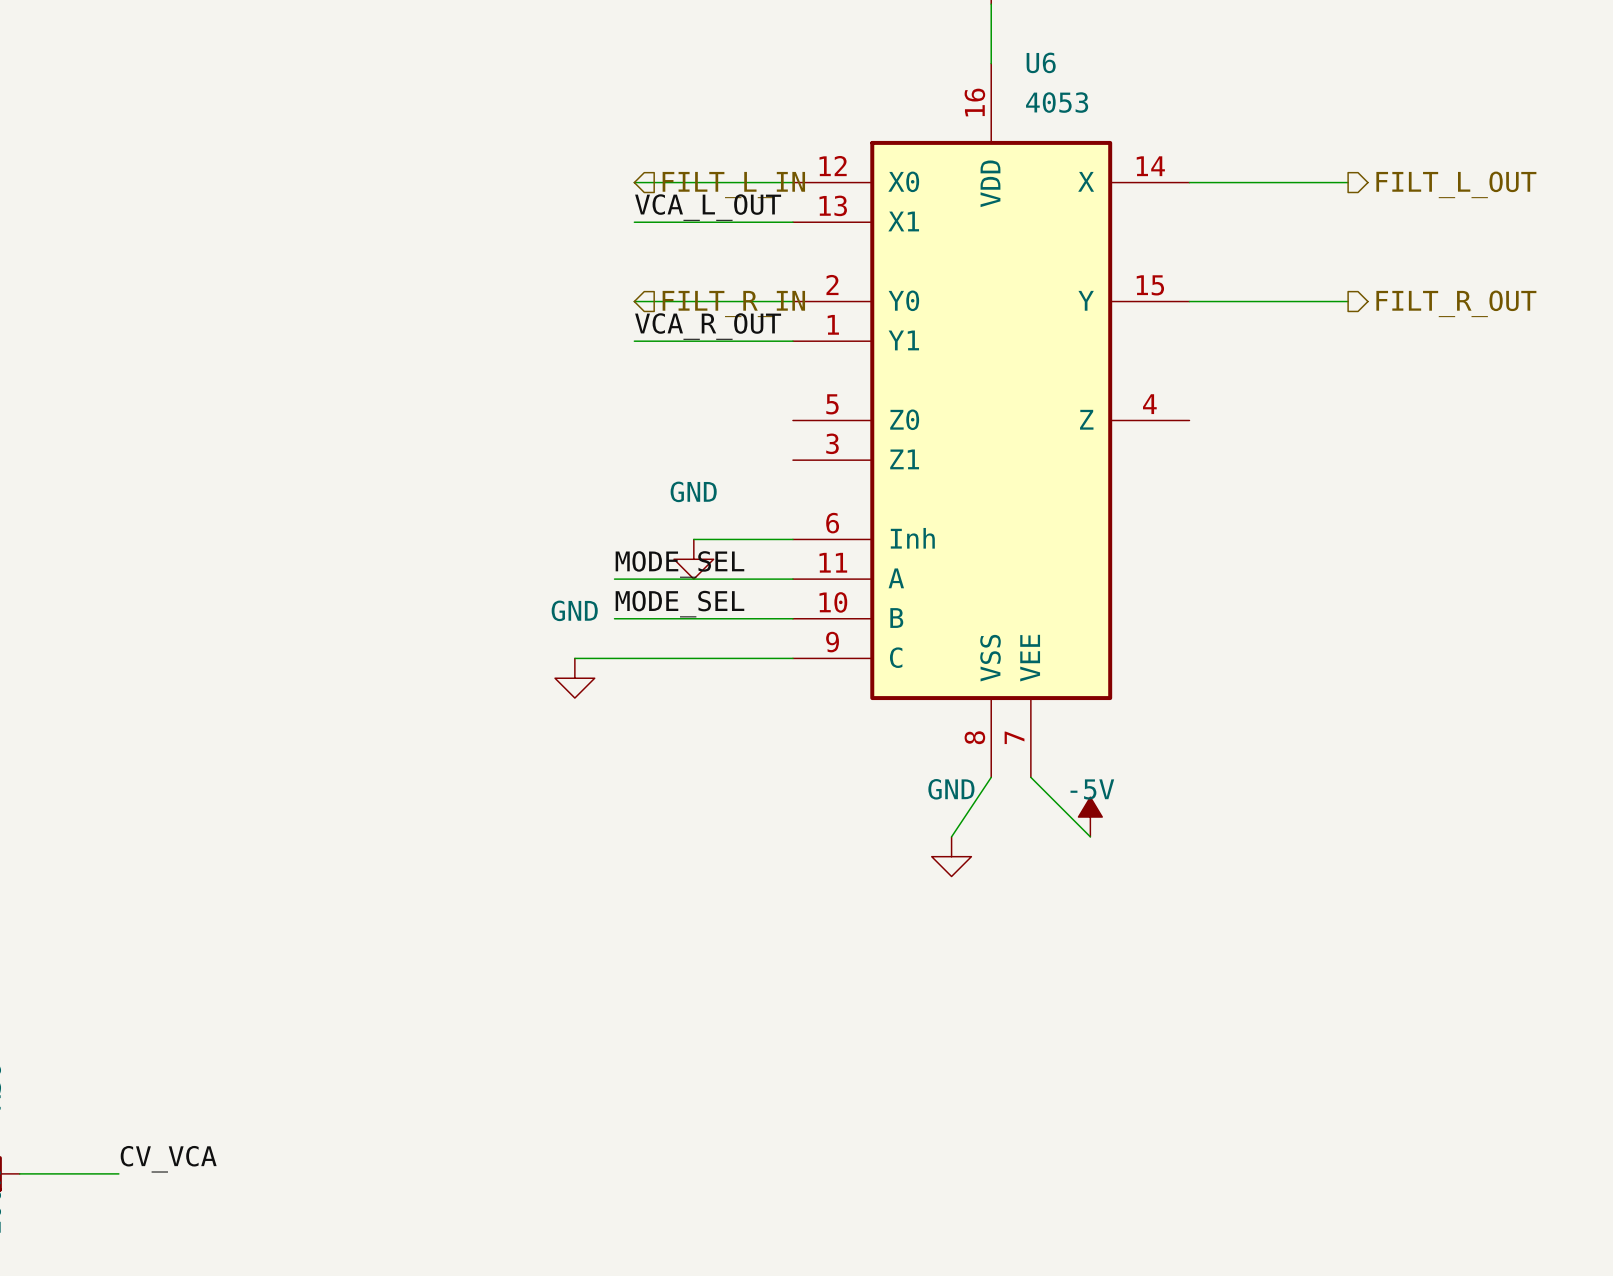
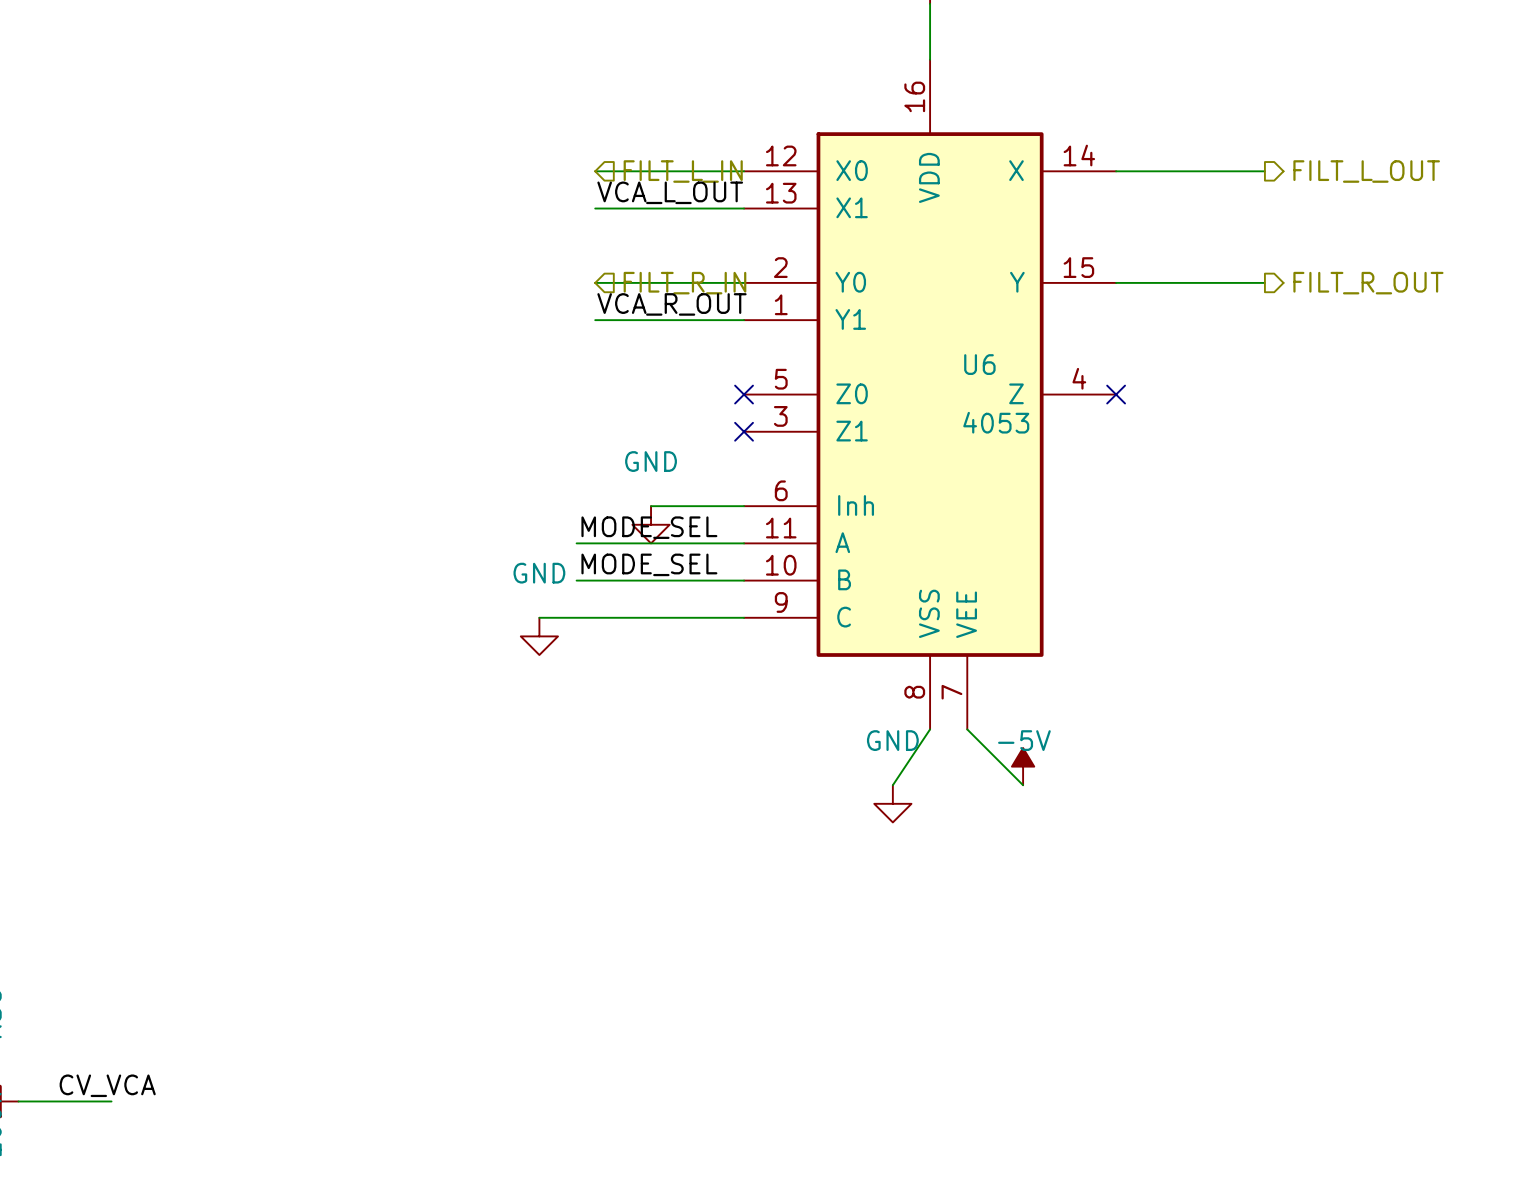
U6 name position: U6 (1041, 62) -> U6 (979, 364)
U6 value position: 4053 (1057, 102) -> 4053 (996, 422)
no-connect mark: none -> (744, 394)
no-connect mark: none -> (1116, 394)
no-connect mark: none -> (744, 431)
label position: CV_VCA (168, 1159) -> CV_VCA (107, 1085)

